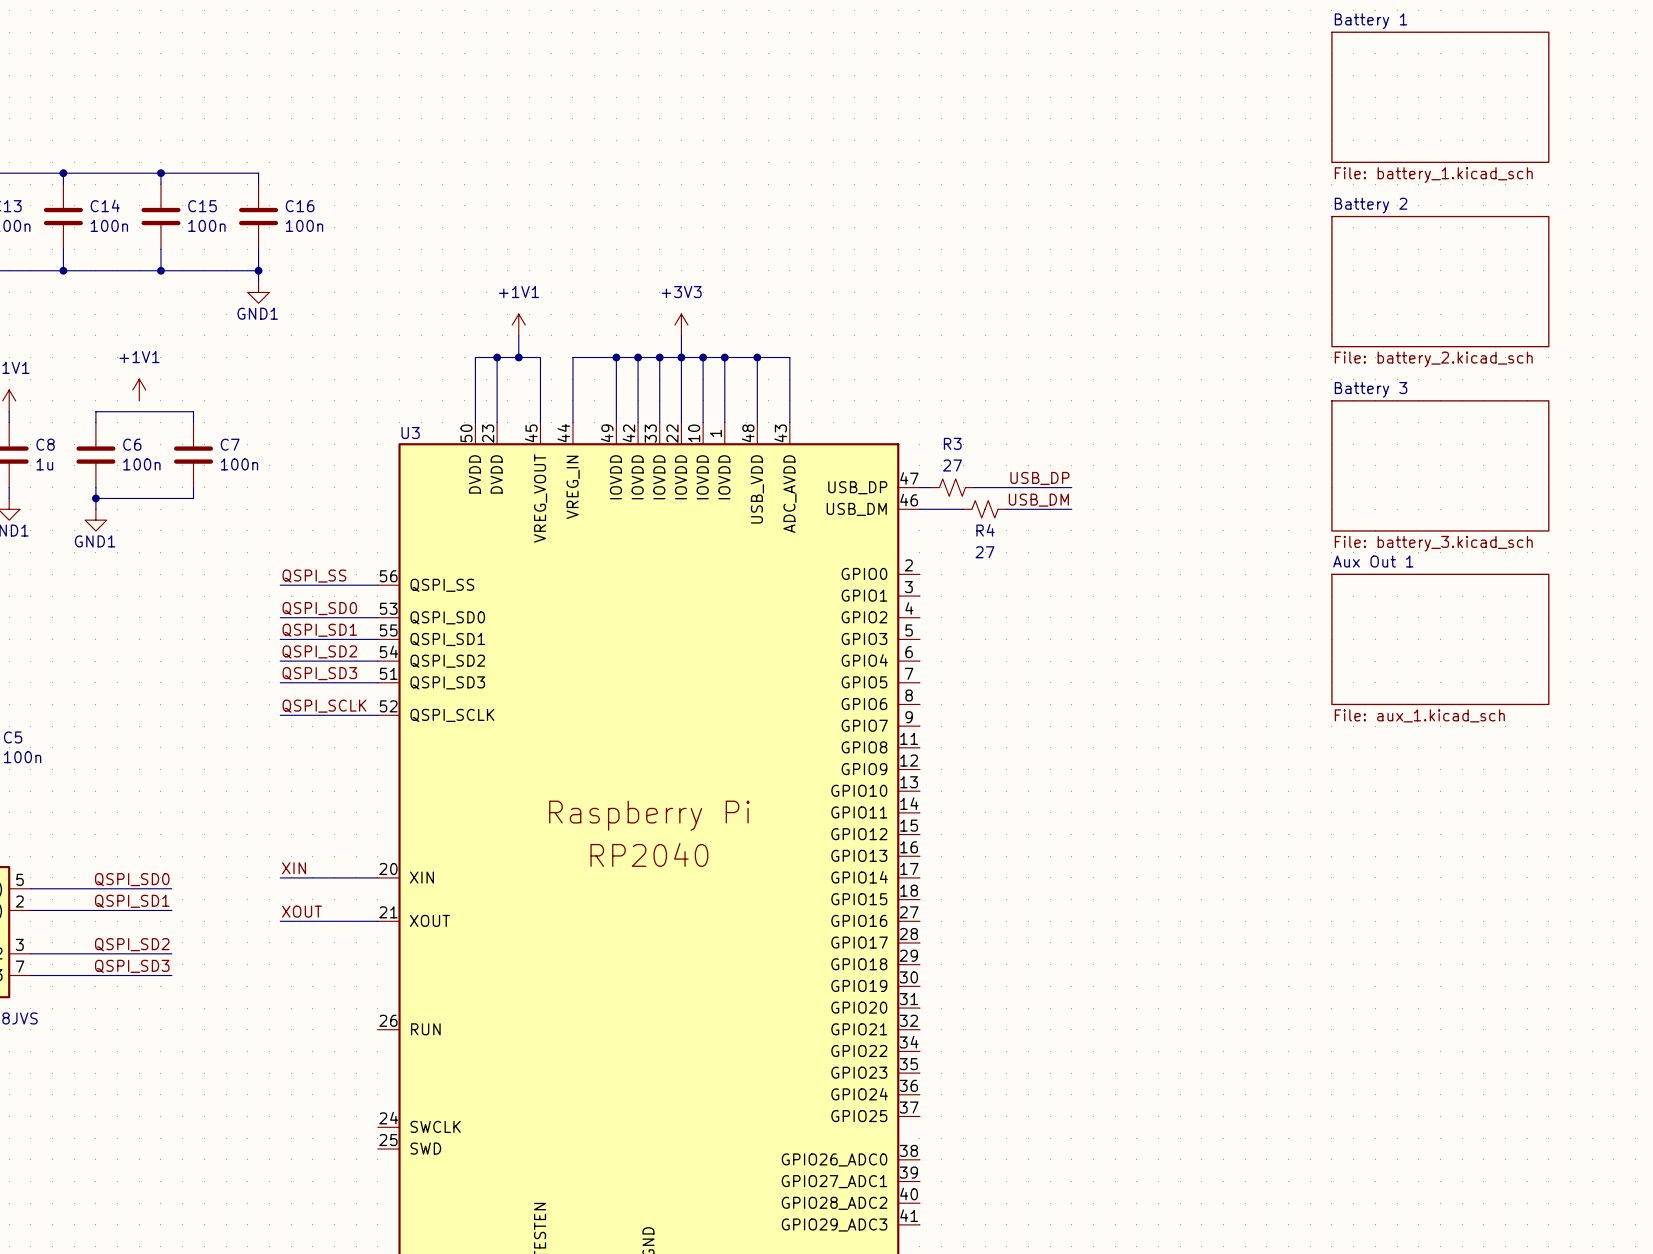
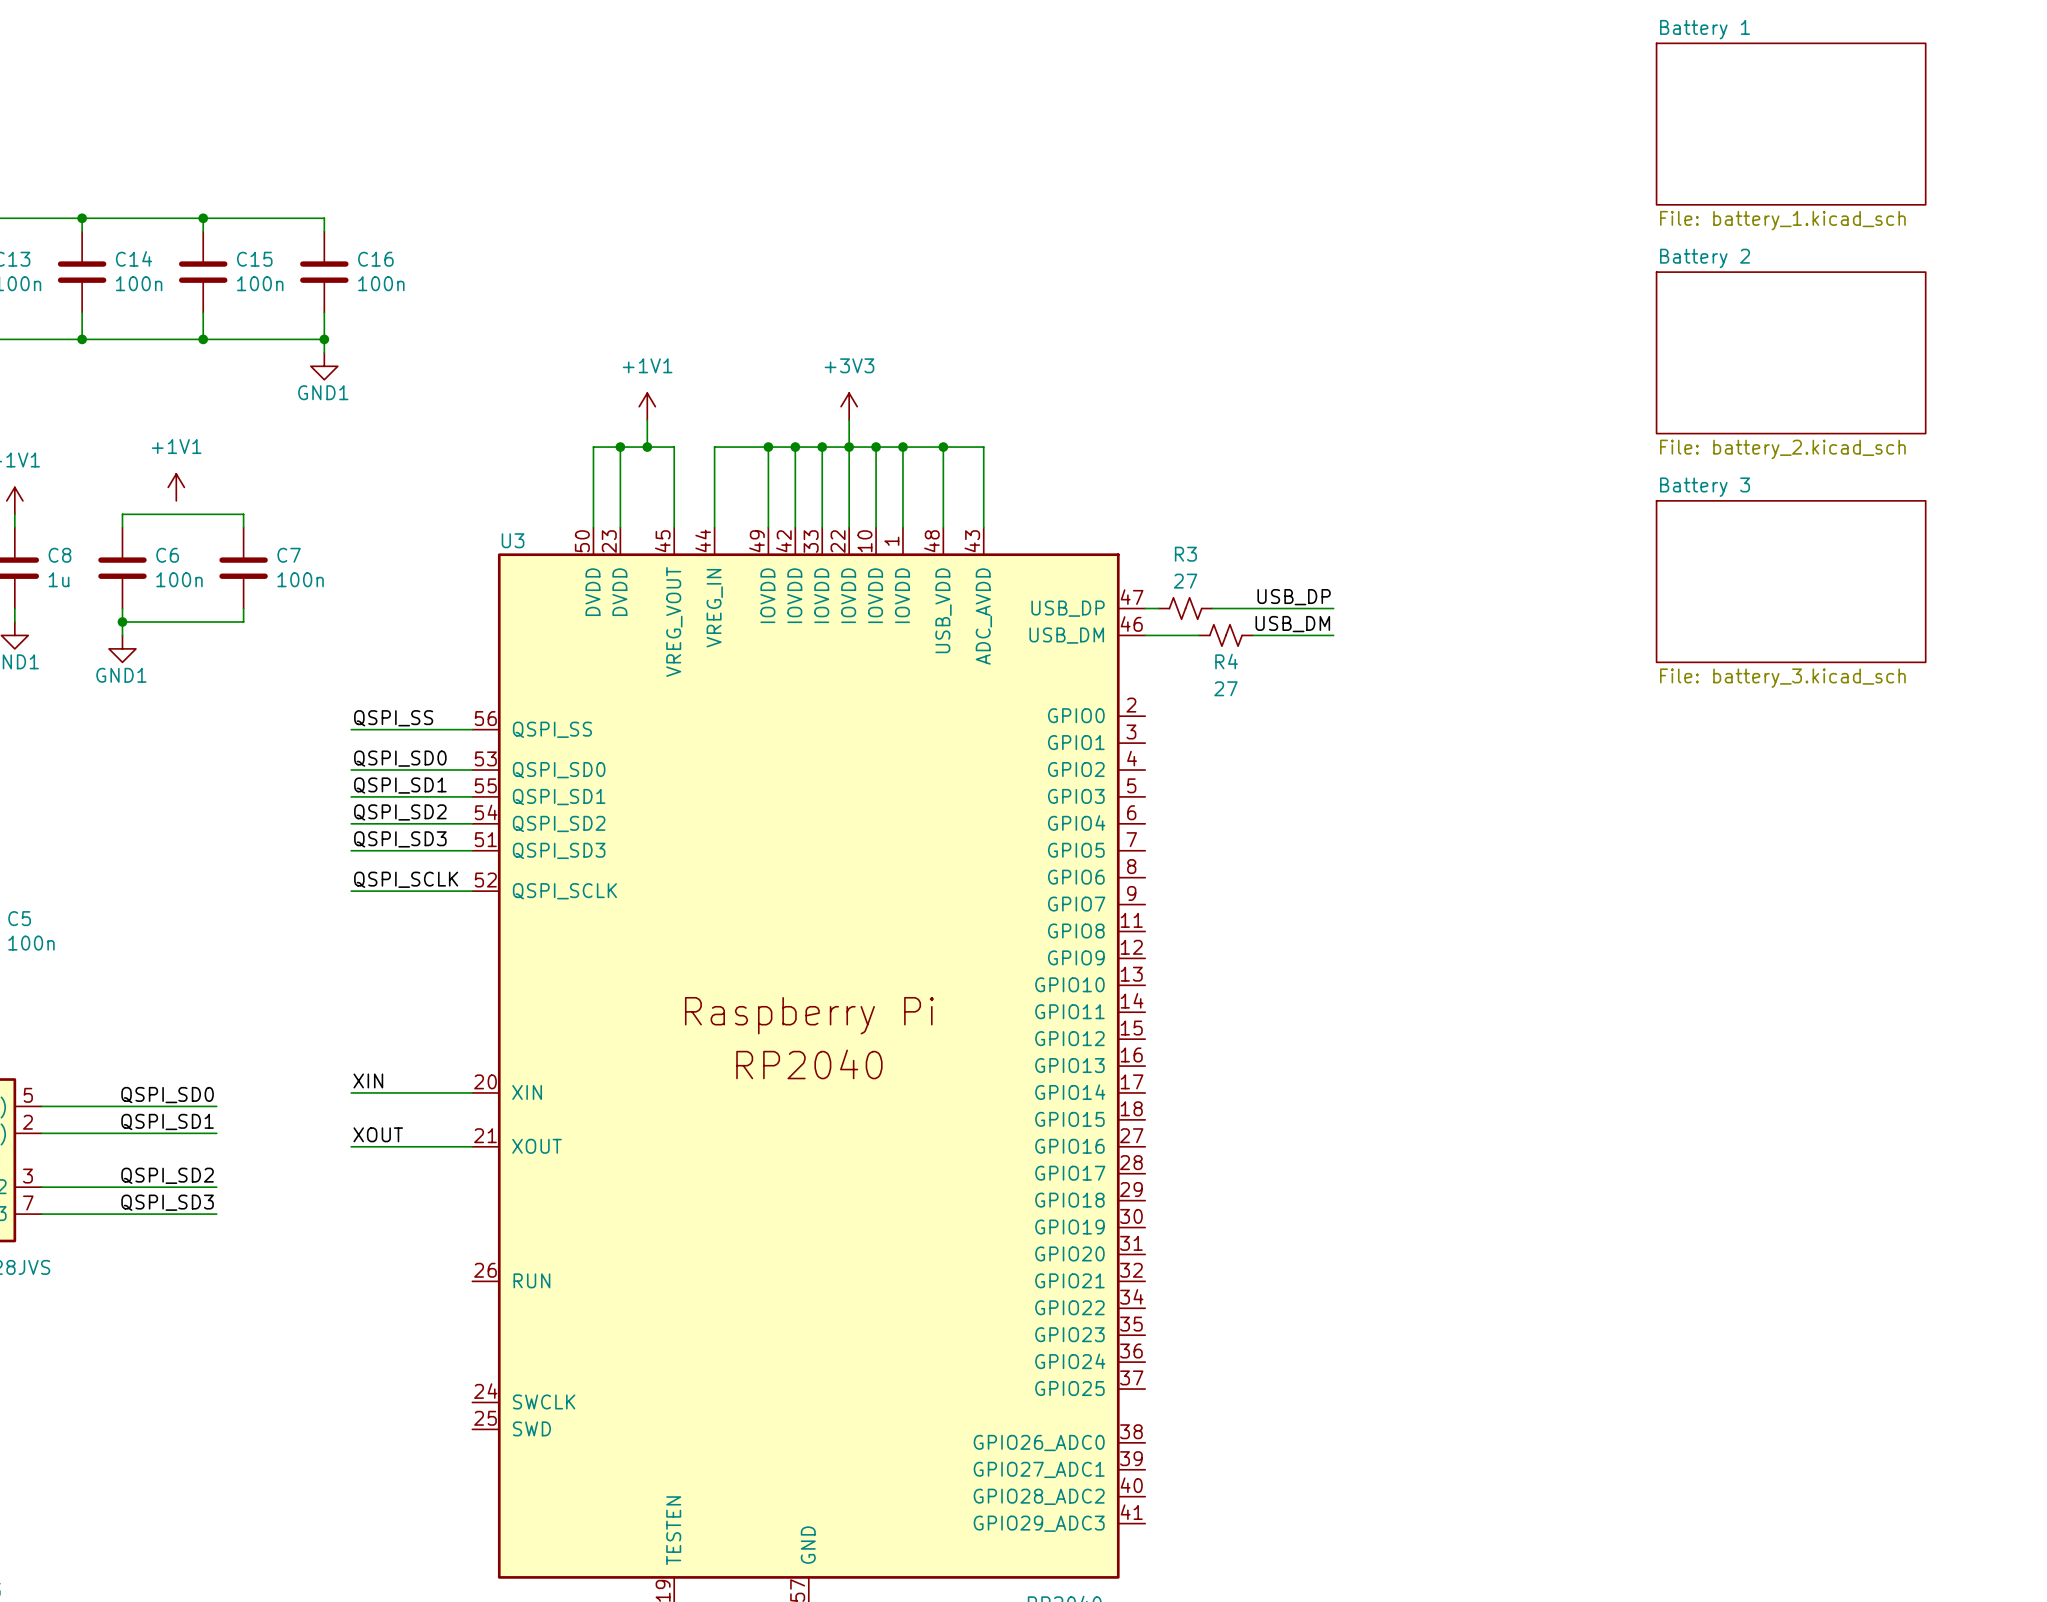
sheet Aux Out 1: File: aux_1.kicad_sch (1440, 639) -> none

